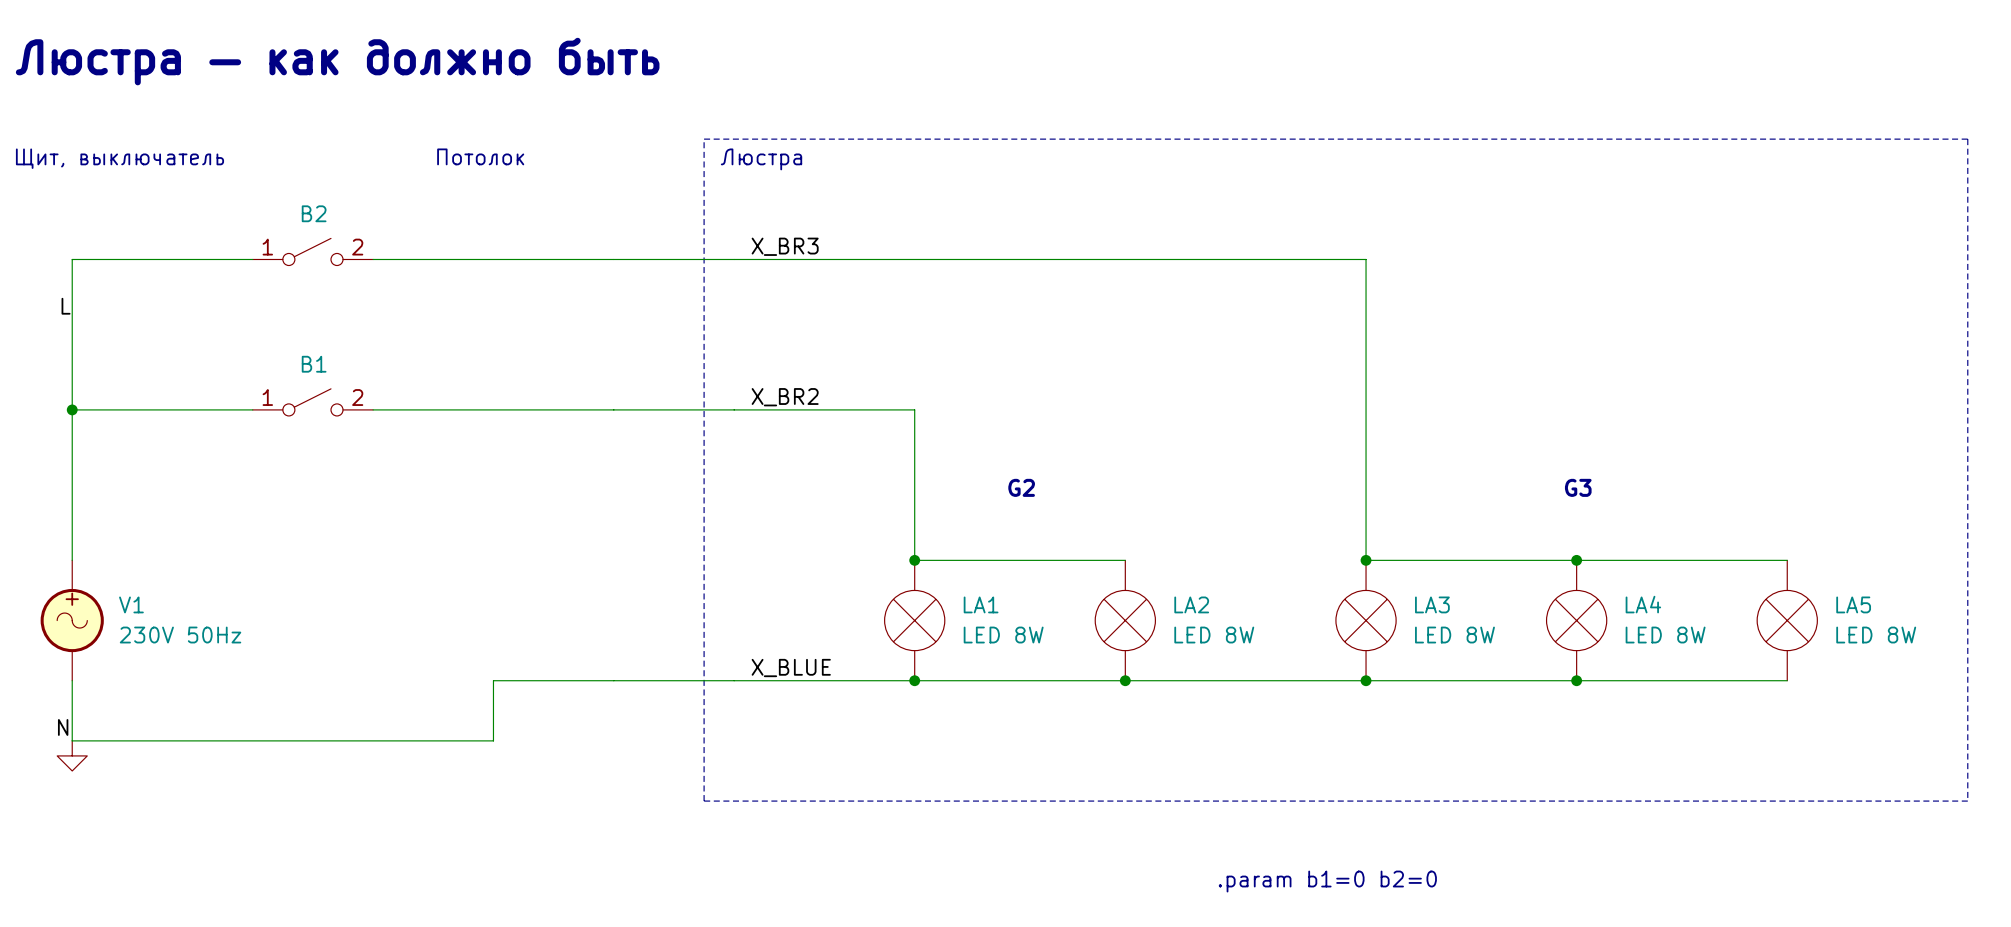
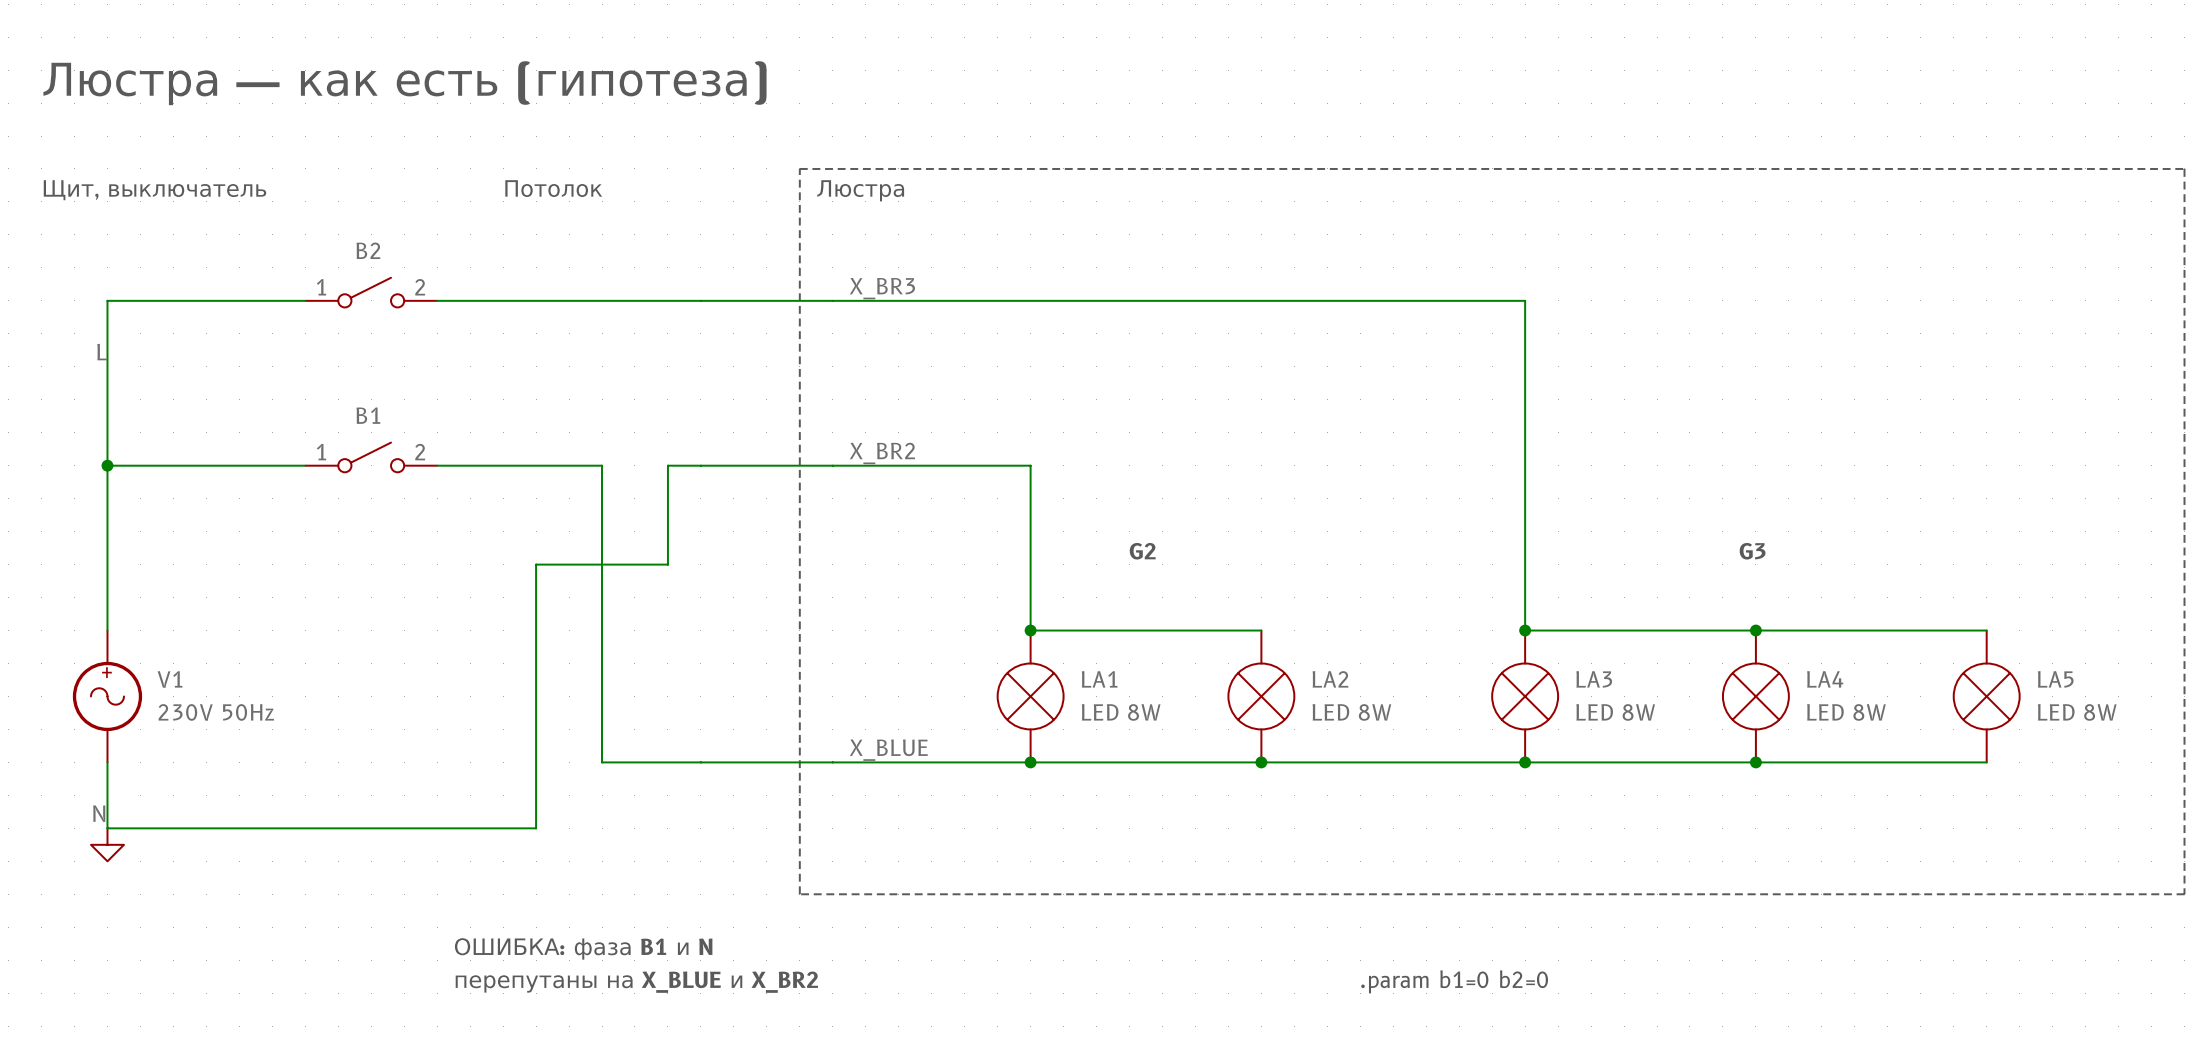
text: Люстра — как должно быть (337, 61) -> Люстра — как есть (гипотеза) (404, 83)
wire: (523, 409) (583, 409) -> (602, 465) (602, 762)
wire: (523, 680) (493, 680) (493, 740) (463, 740) -> (667, 465) (667, 564) (536, 564) (536, 828)
text: none -> ОШИБКА: фаза B1 и N (583, 948)
text: none -> перепутаны на X_BLUE и X_BR2 (636, 982)

